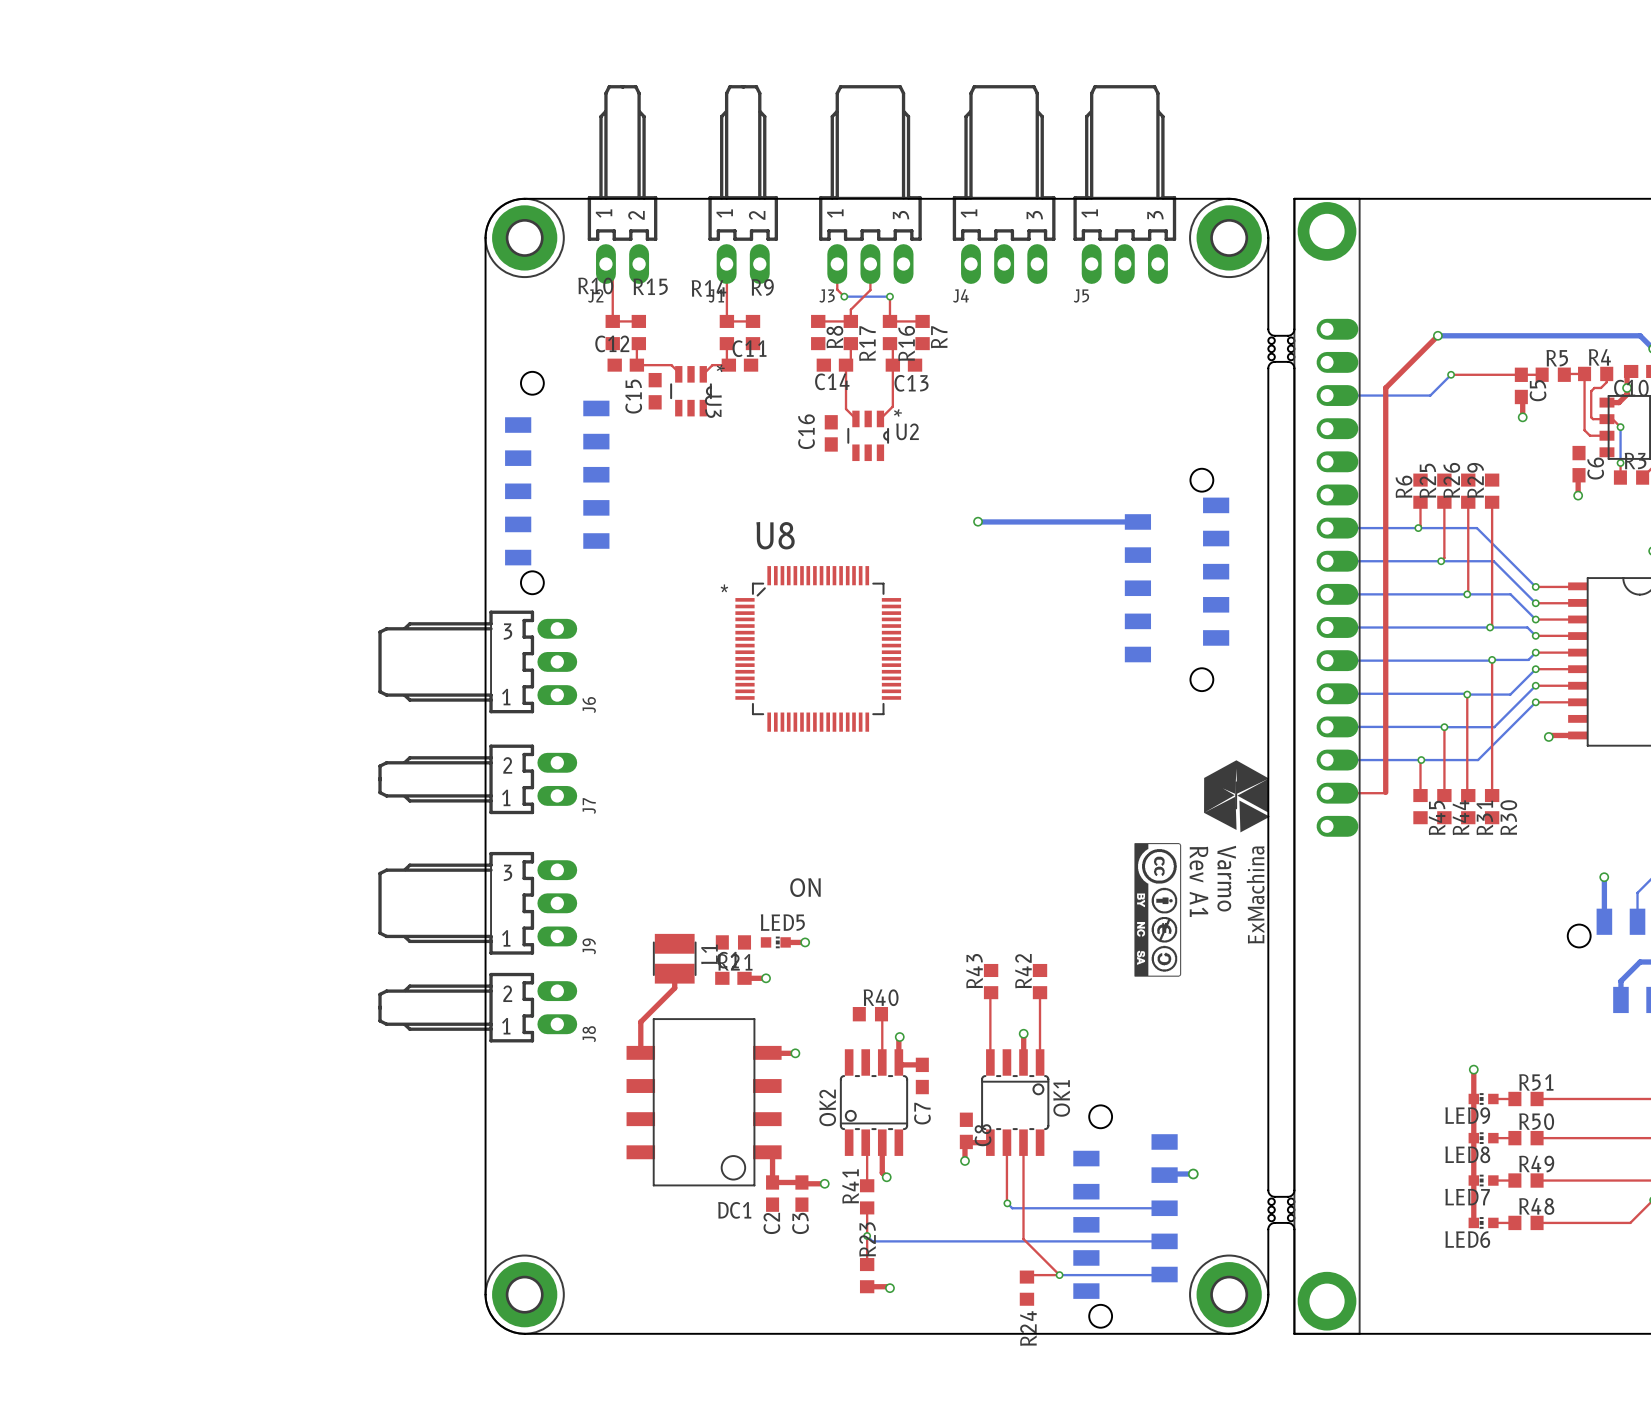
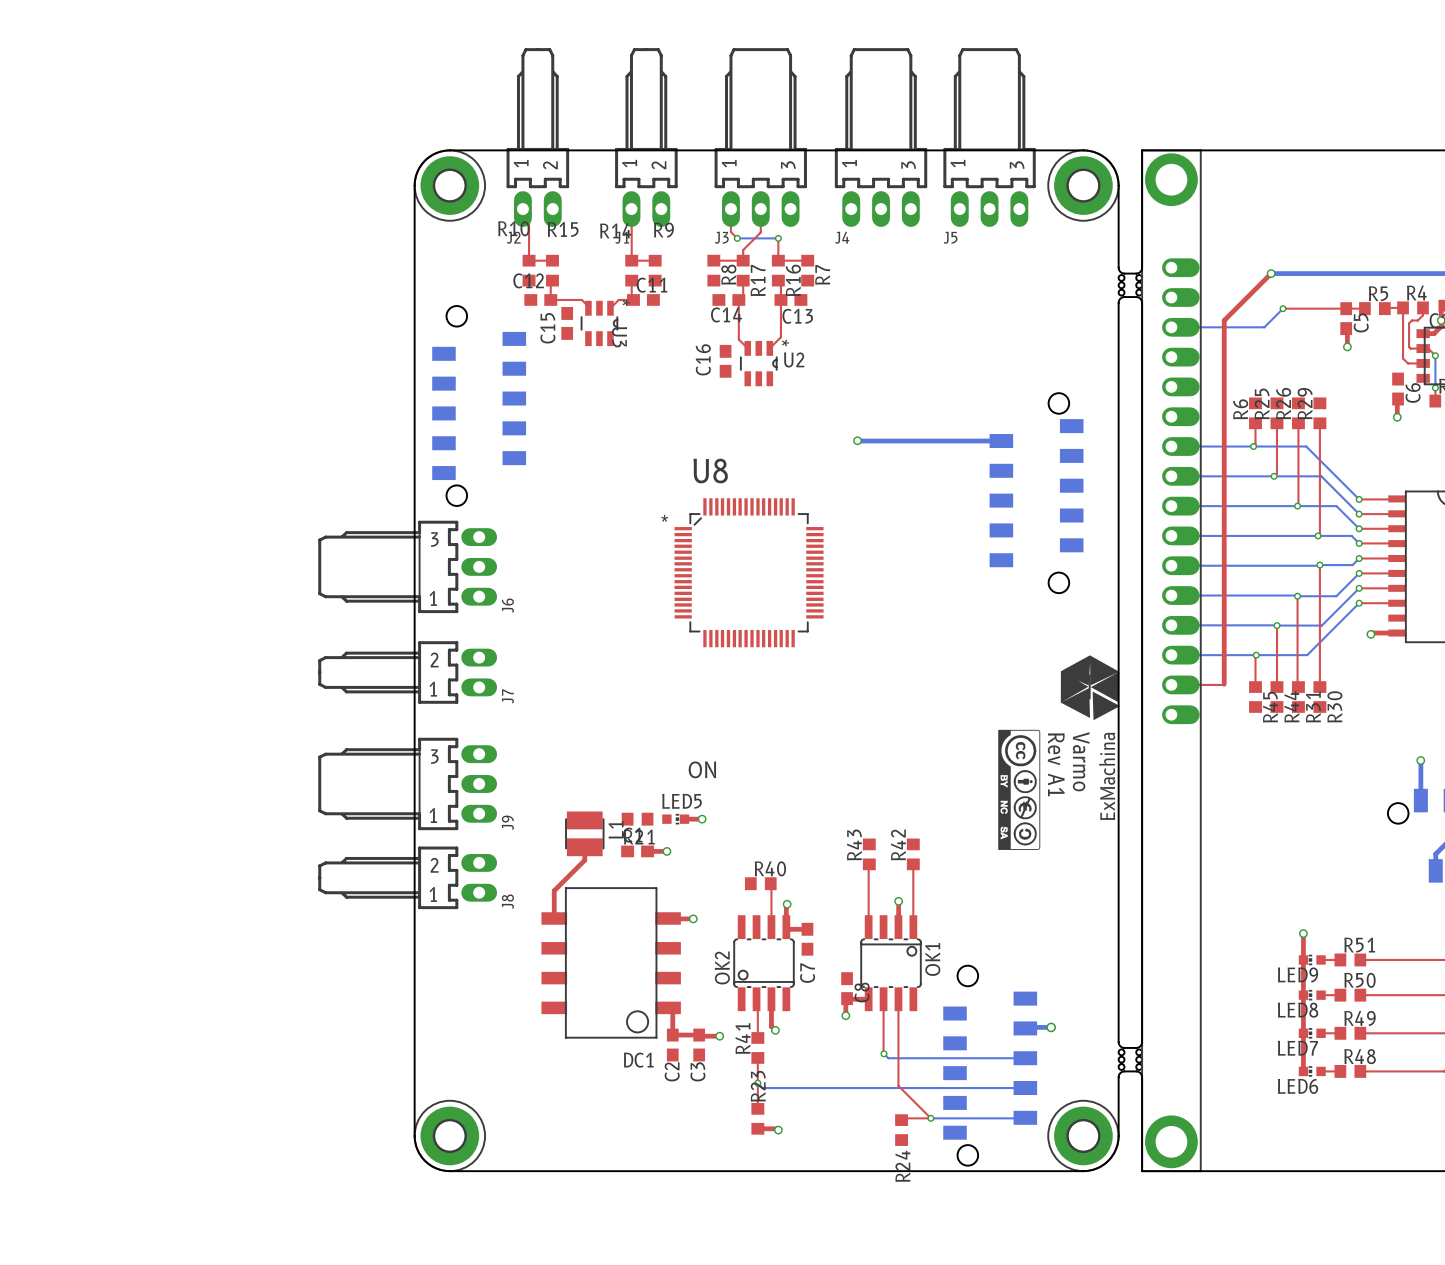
U8 position: (818, 648) -> (749, 572)

